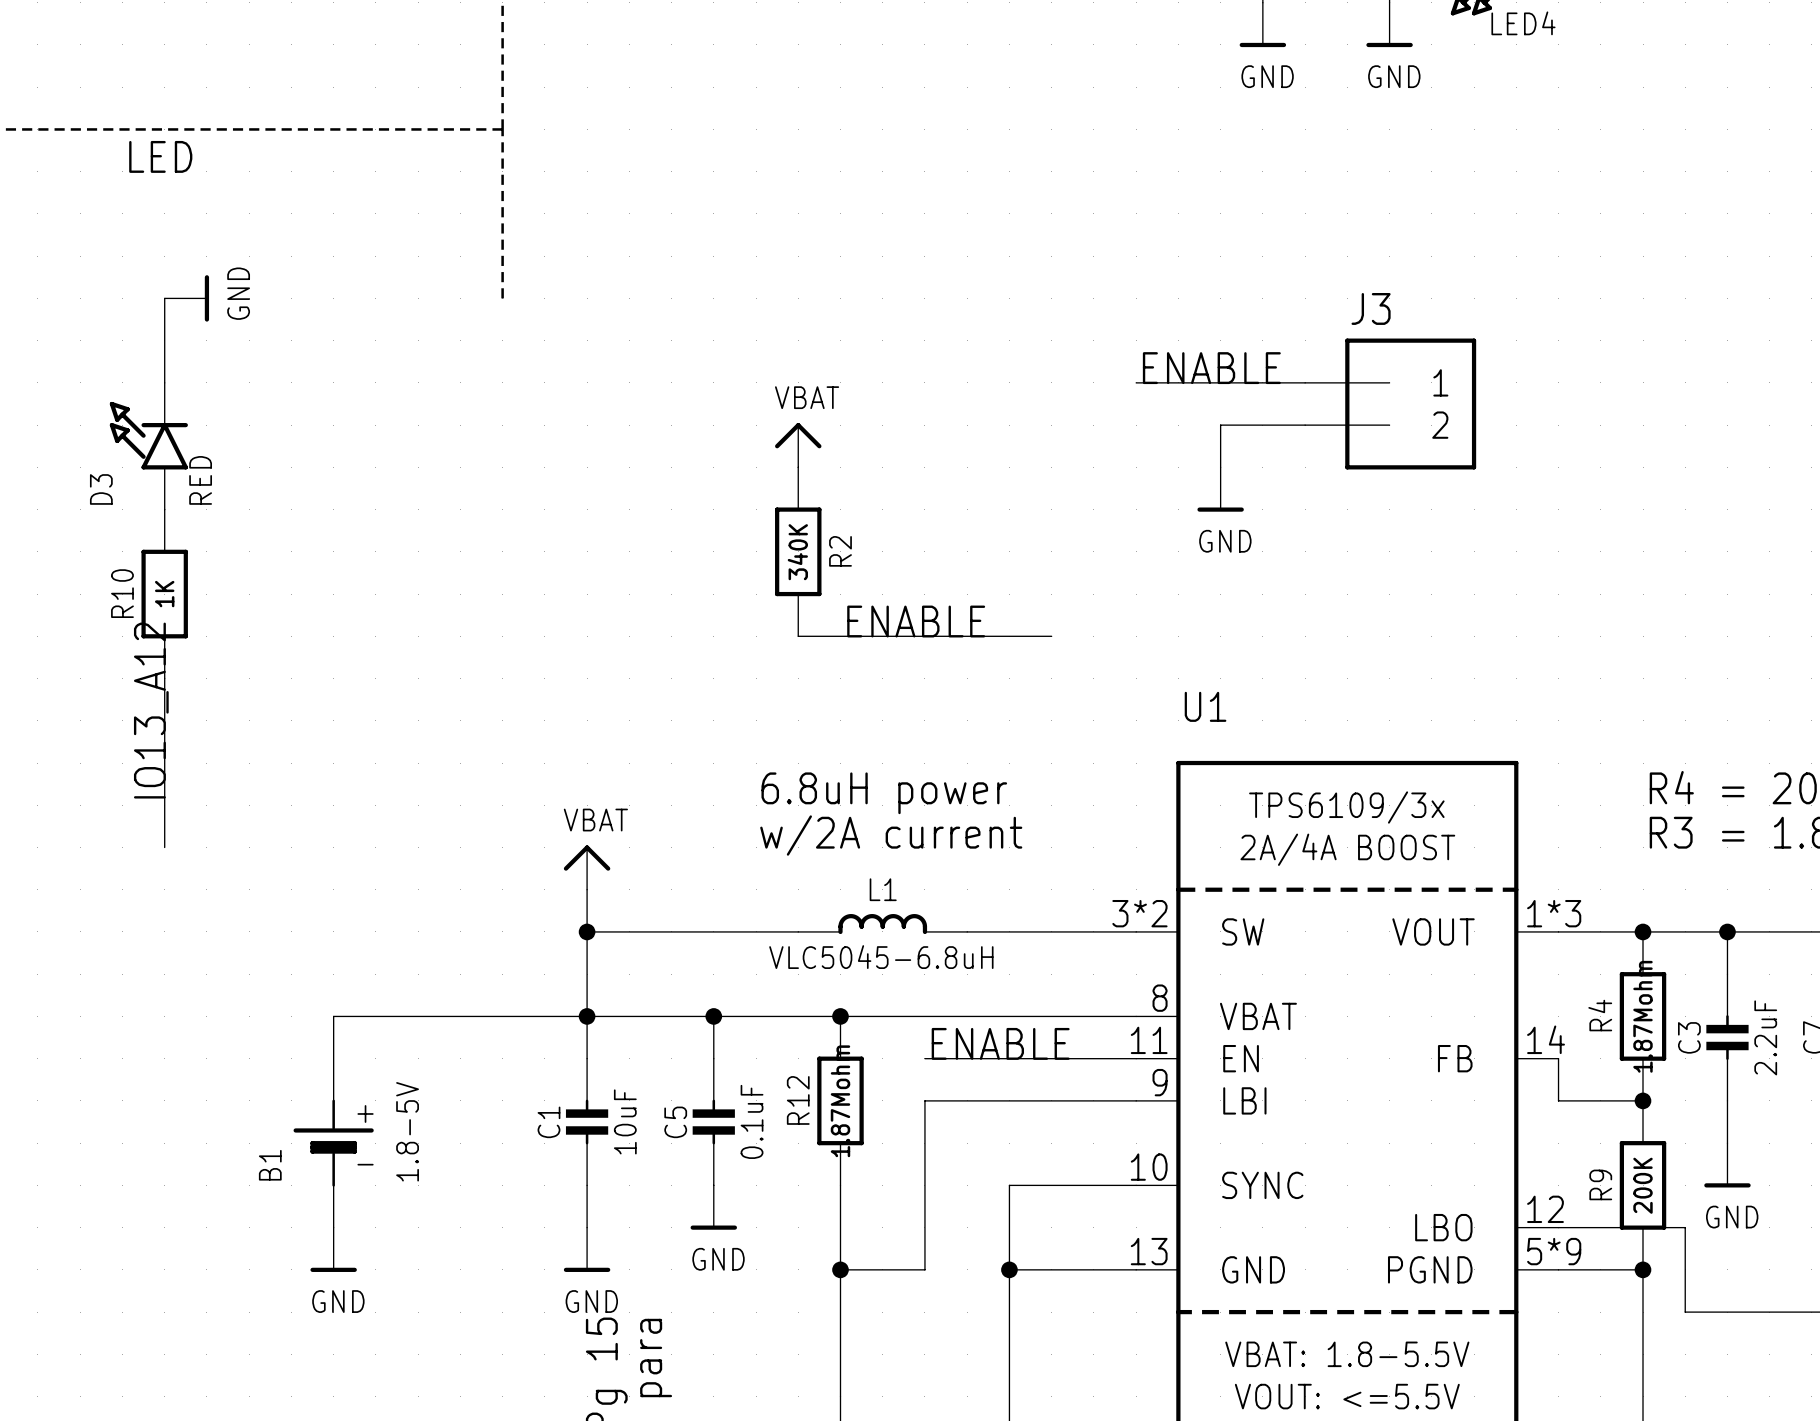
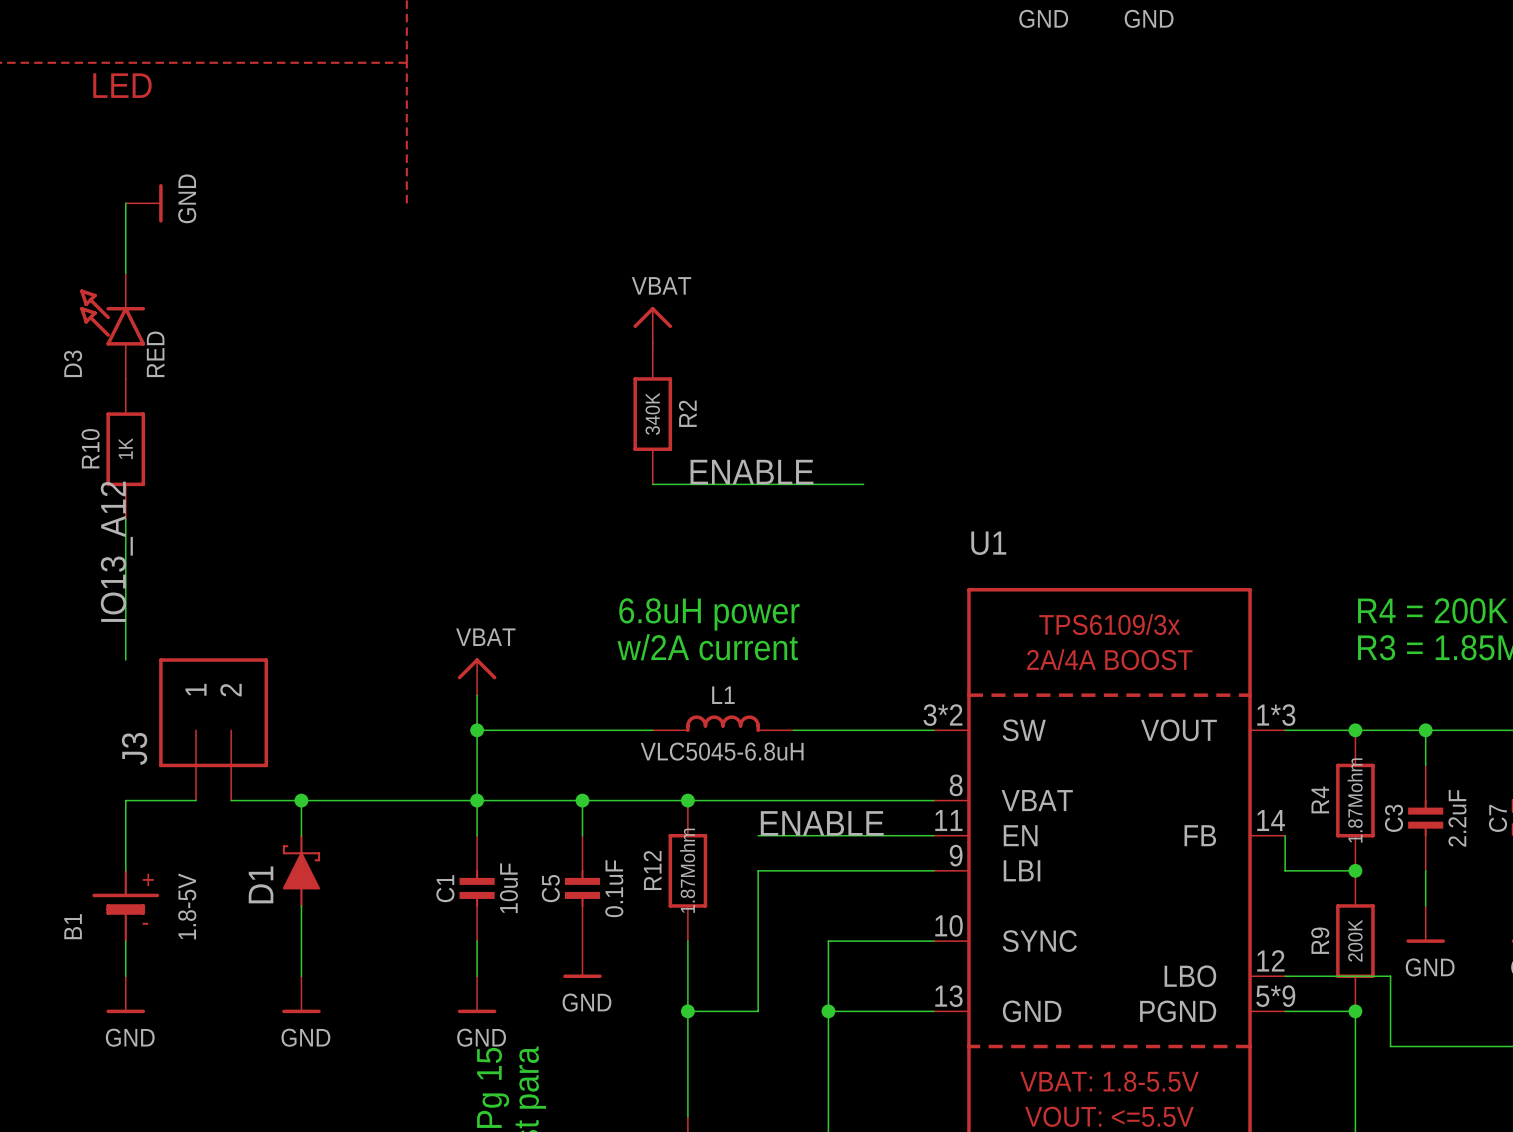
label: ENABLE (1211, 368) -> none
wire: (1136, 382) (1305, 382) -> none
J3 position: (1390, 404) -> (213, 729)
J3 rotation: 0° (1410, 404) -> 90° counterclockwise (213, 712)
wire: (1305, 425) (1220, 425) (1220, 467) -> none
power symbol: GND (1220, 489) -> none
wire: none -> (196, 800) (125, 800) (125, 870)
wire: (333, 1016) (333, 1100) -> (266, 800) (231, 800)
wire: none -> (301, 800) (301, 835)
junction: none -> (301, 800)
D1: none -> (301, 870)
B1 position: (333, 1143) -> (125, 905)
wire: none -> (301, 905) (301, 976)
wire: (333, 1185) (333, 1227) -> (125, 941) (125, 976)
power symbol: none -> GND (125, 994)
power symbol position: GND (333, 1249) -> GND (301, 994)

